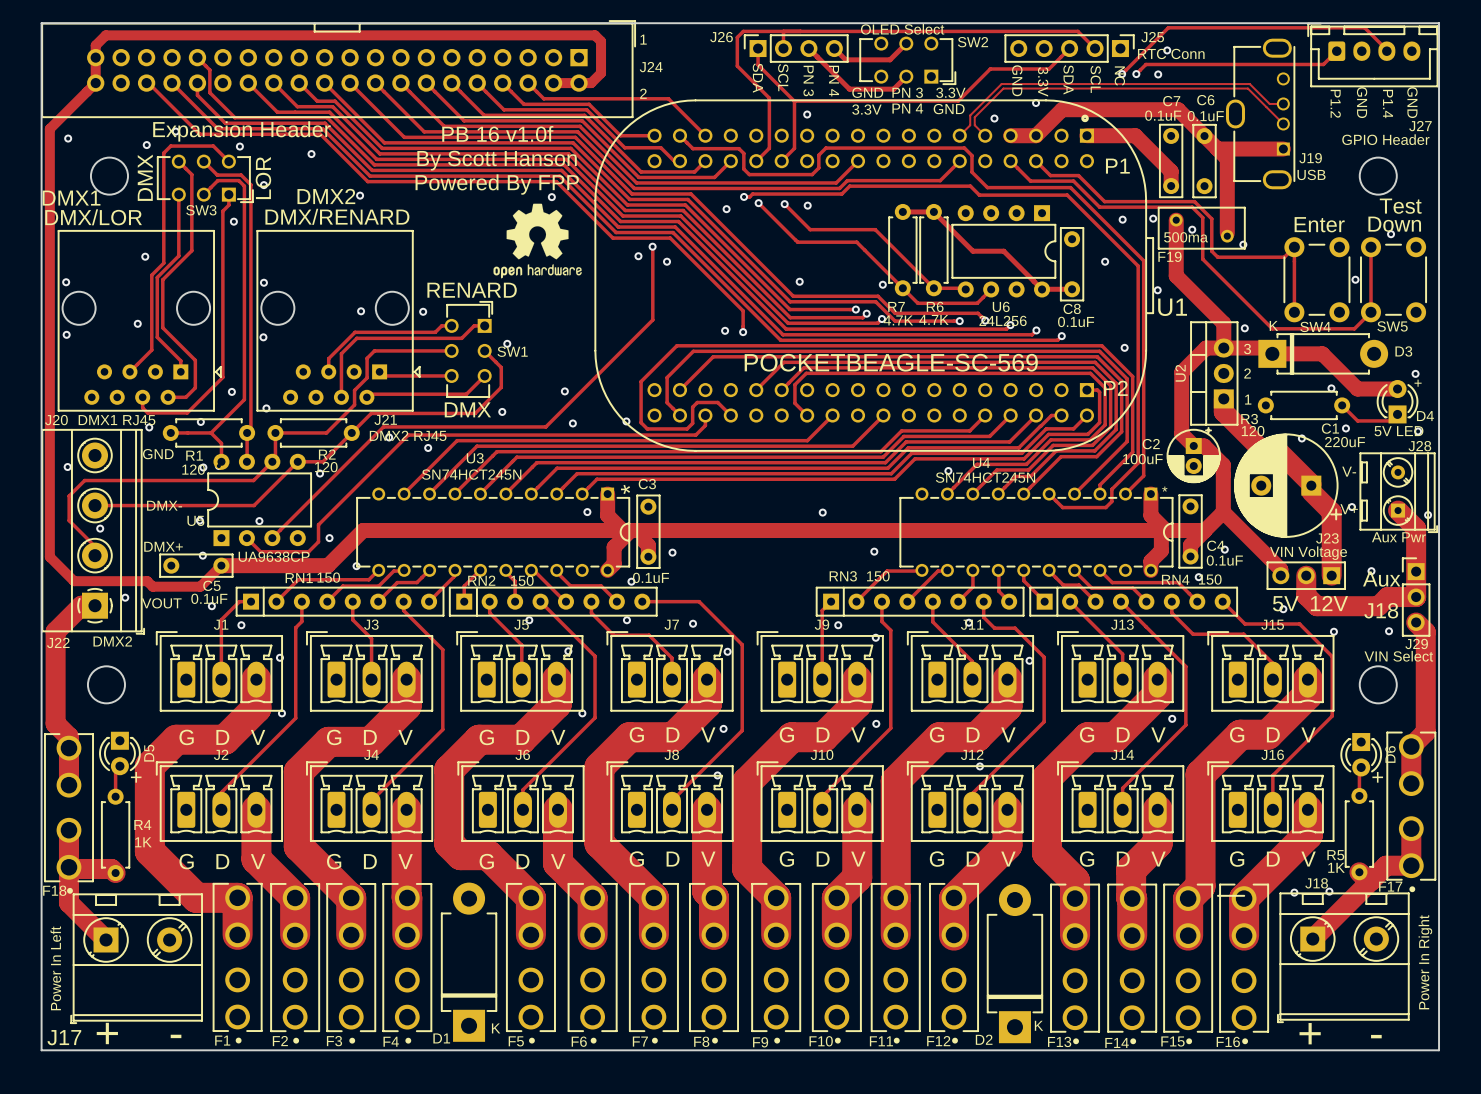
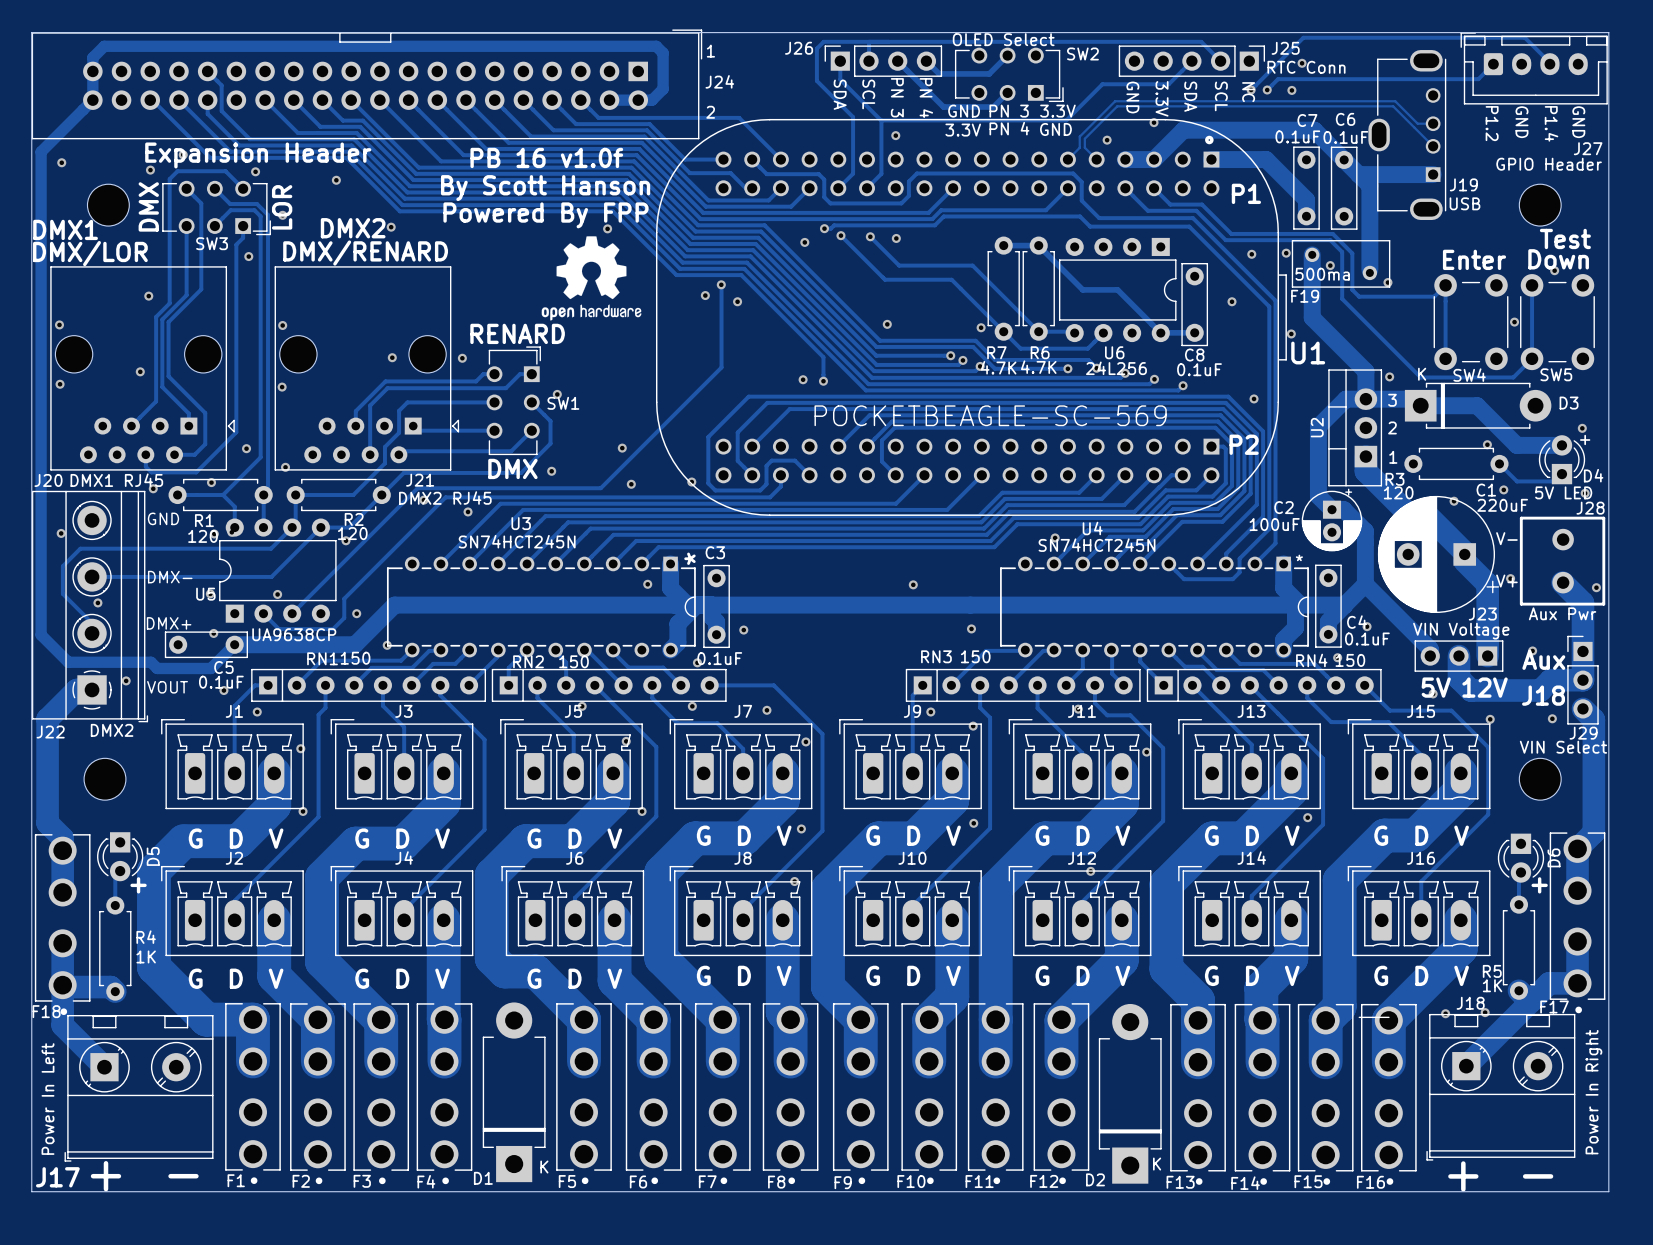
J28 footprint: [1359, 452, 1438, 533] -> [1519, 516, 1606, 606]

